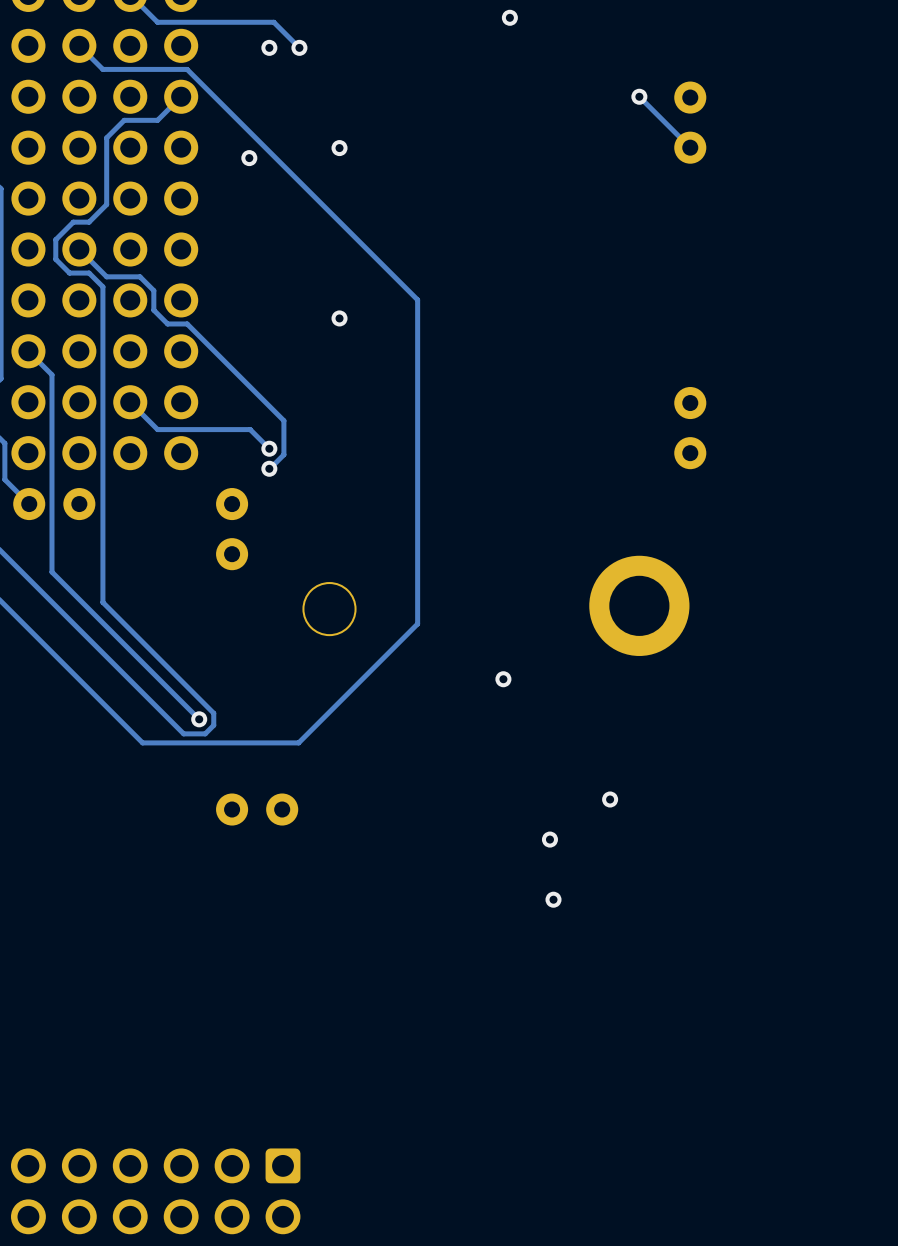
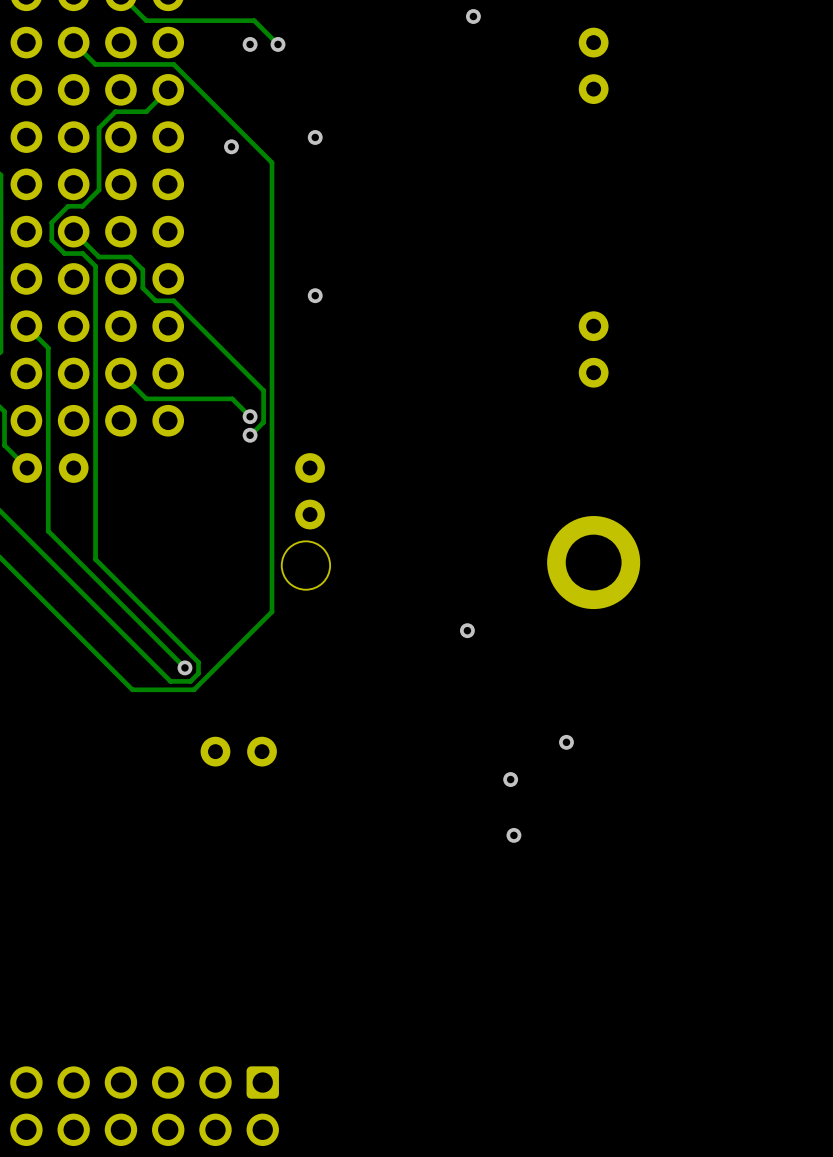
track: (639, 96) (690, 147) -> none
via: (639, 96) -> none
part position: (690, 122) -> (593, 65)
track: (292, 175) (417, 299) (417, 623) (298, 742) (208, 742) -> (272, 162) (272, 611) (194, 689)
part position: (690, 428) -> (593, 349)
part position: (232, 529) -> (310, 491)

